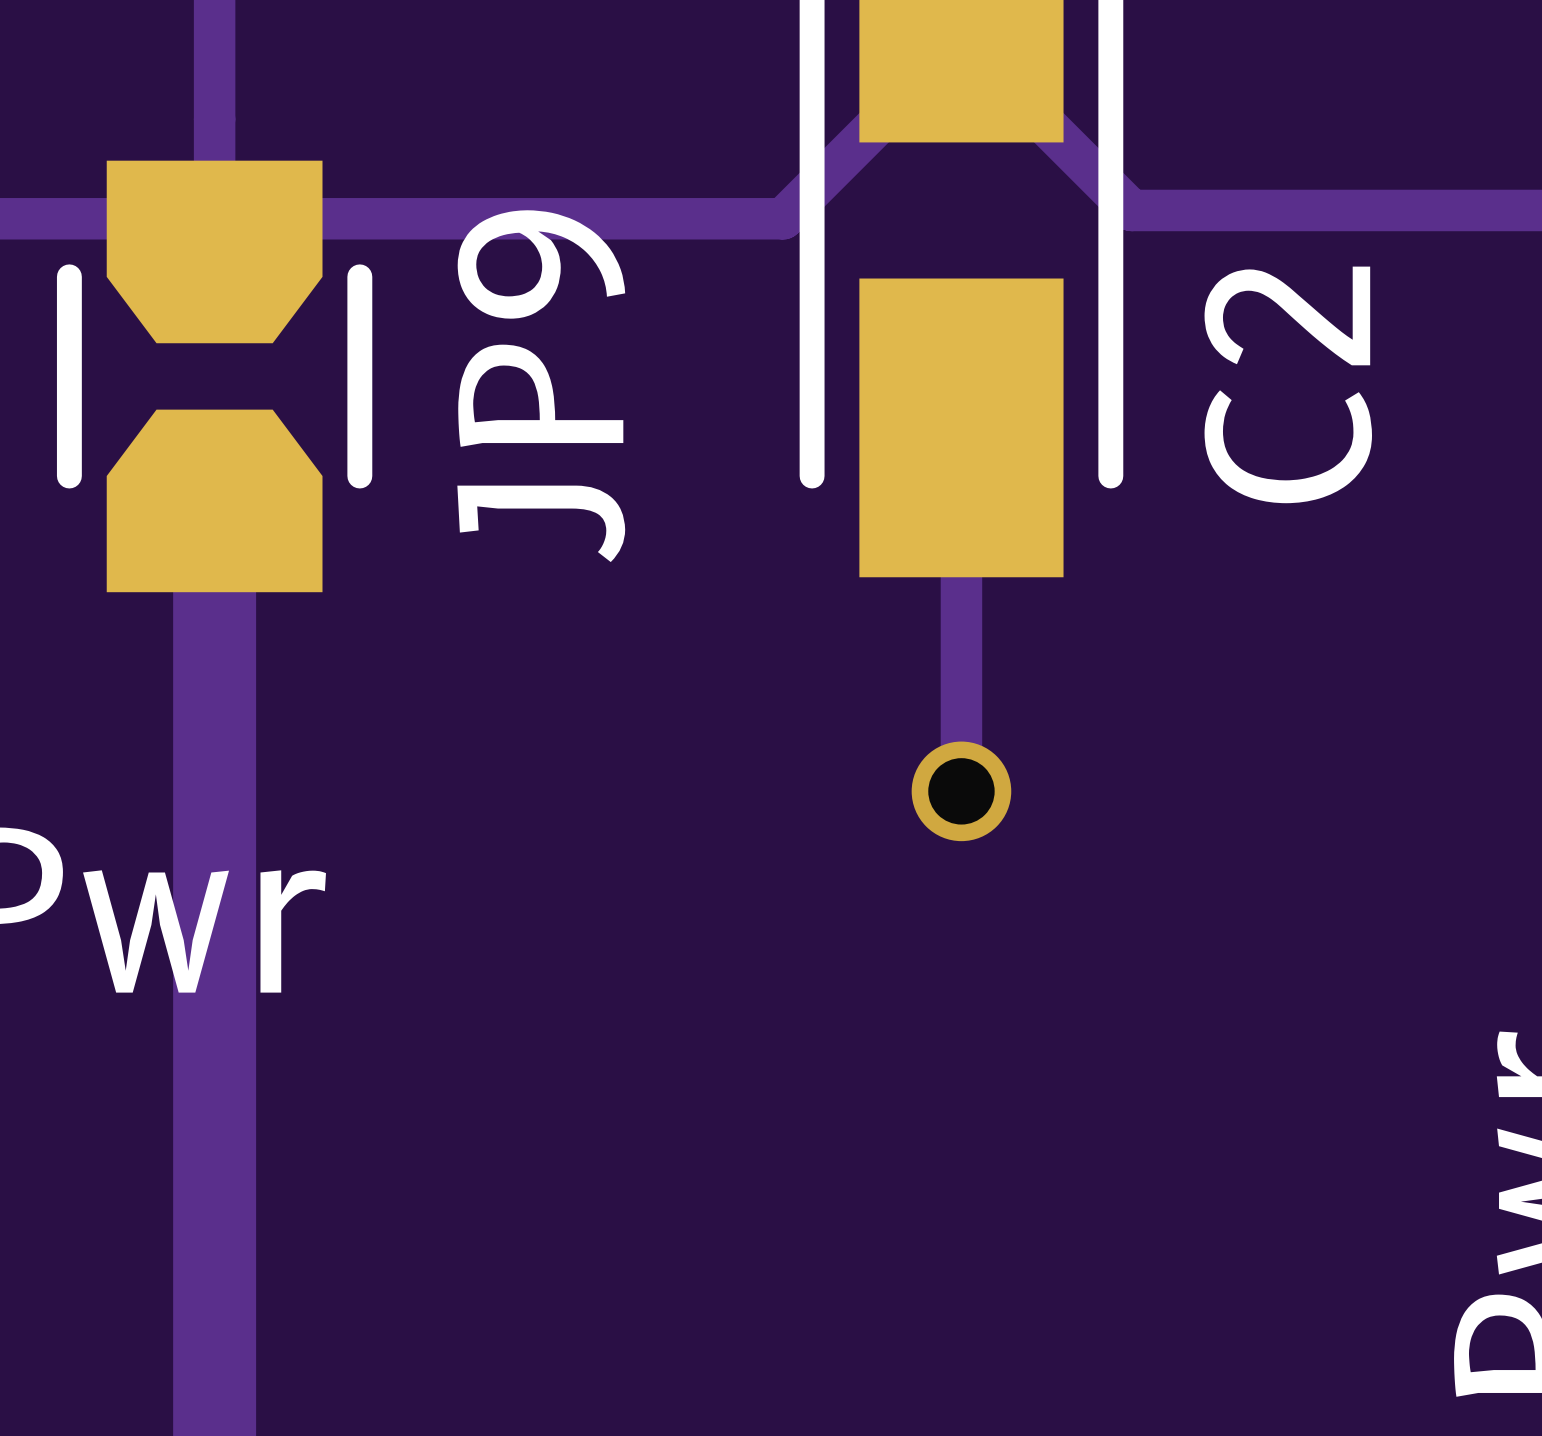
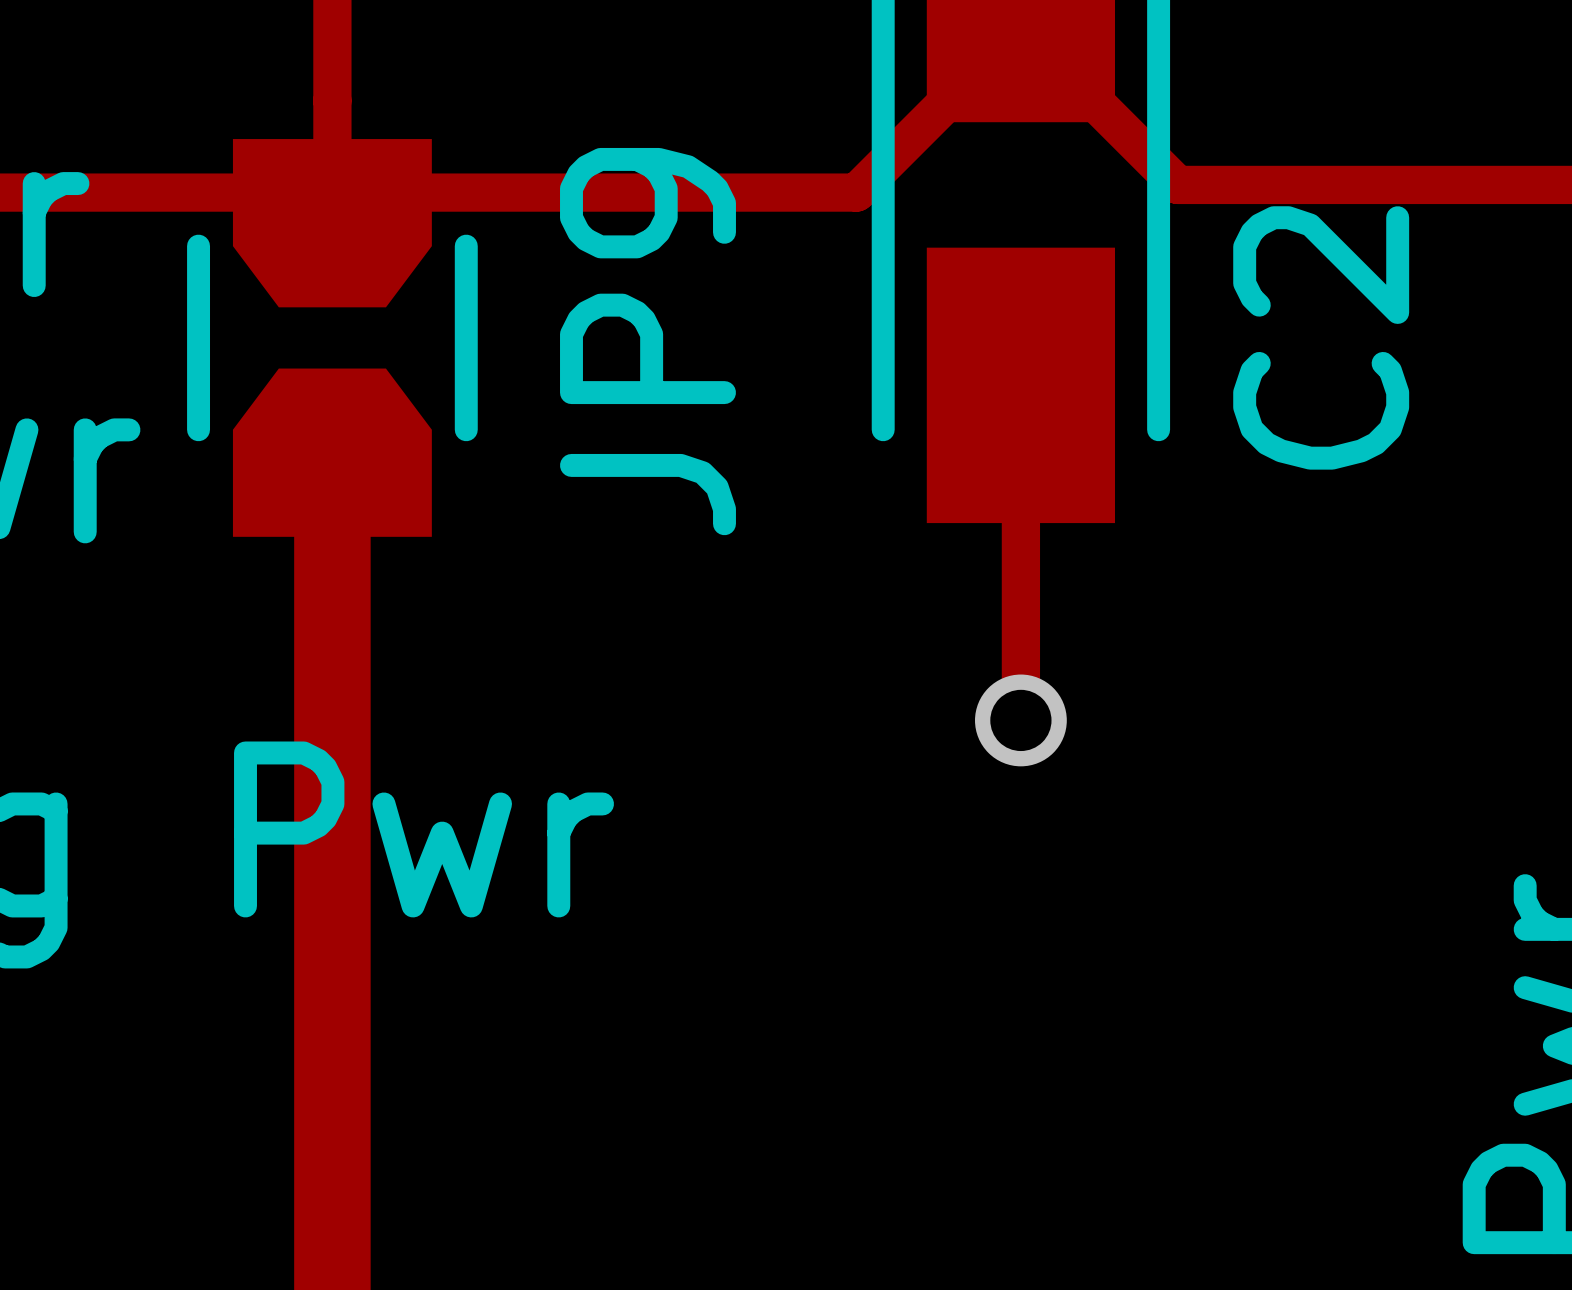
JP9 name position: JP9 (541, 386) -> JP9 (647, 341)

